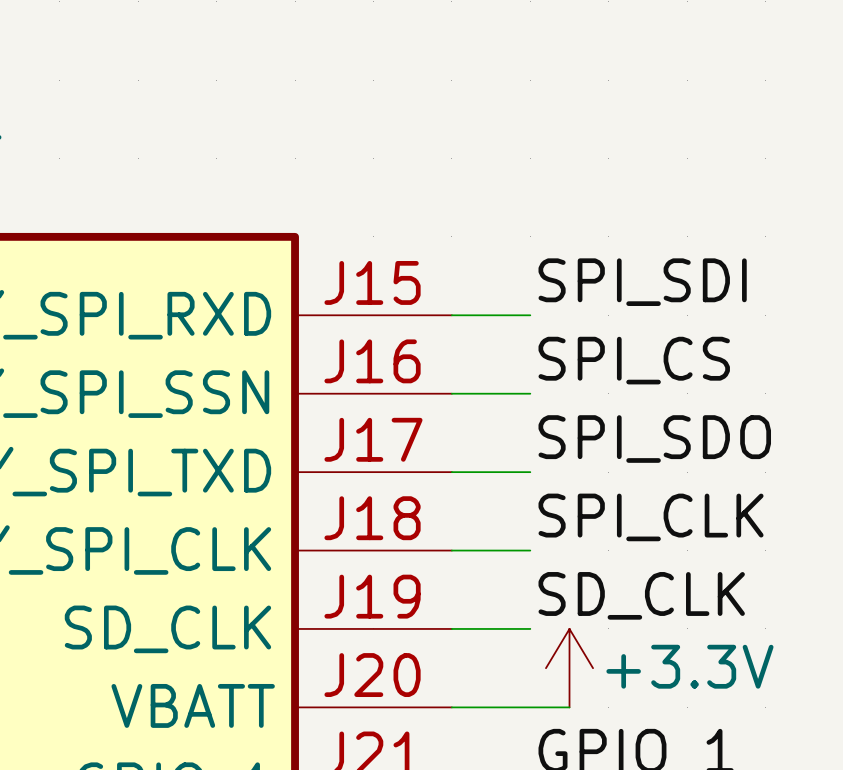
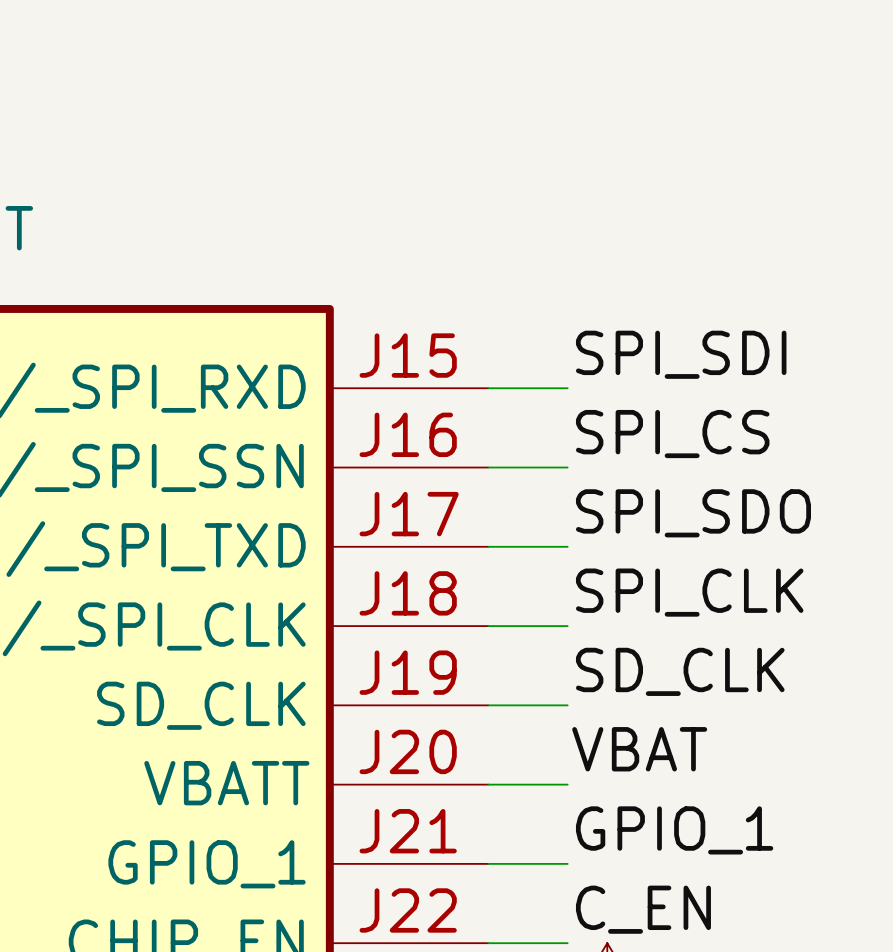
power symbol: +3.3V (569, 668) -> none
label: none -> VBAT (639, 749)
wire: (530, 707) (569, 707) -> none

